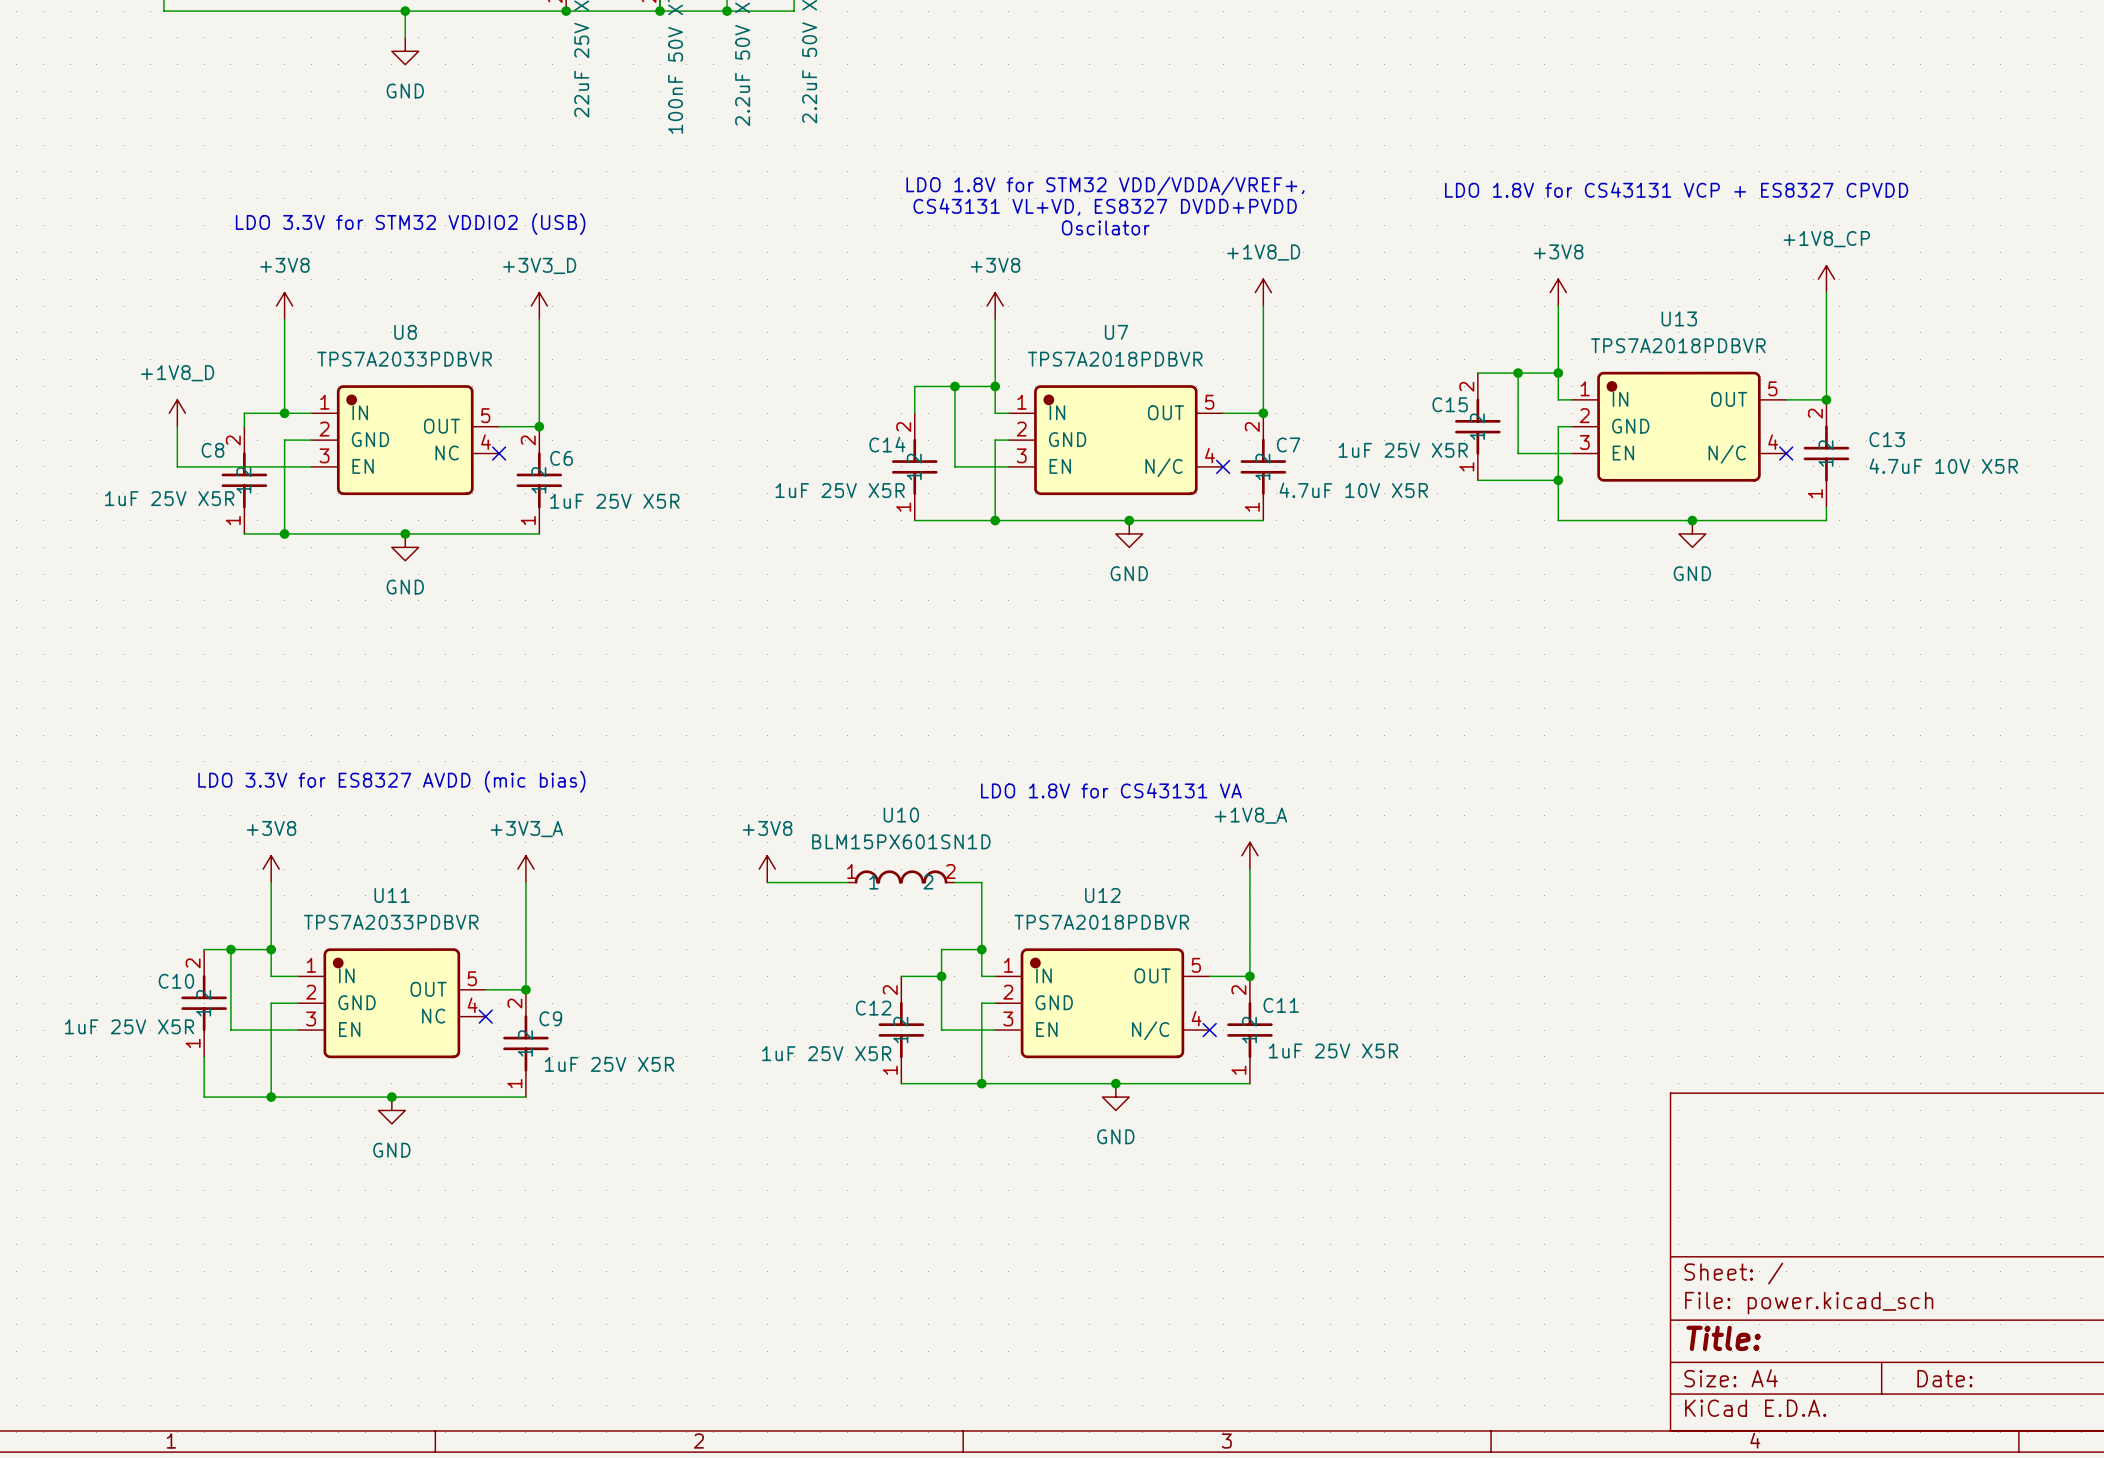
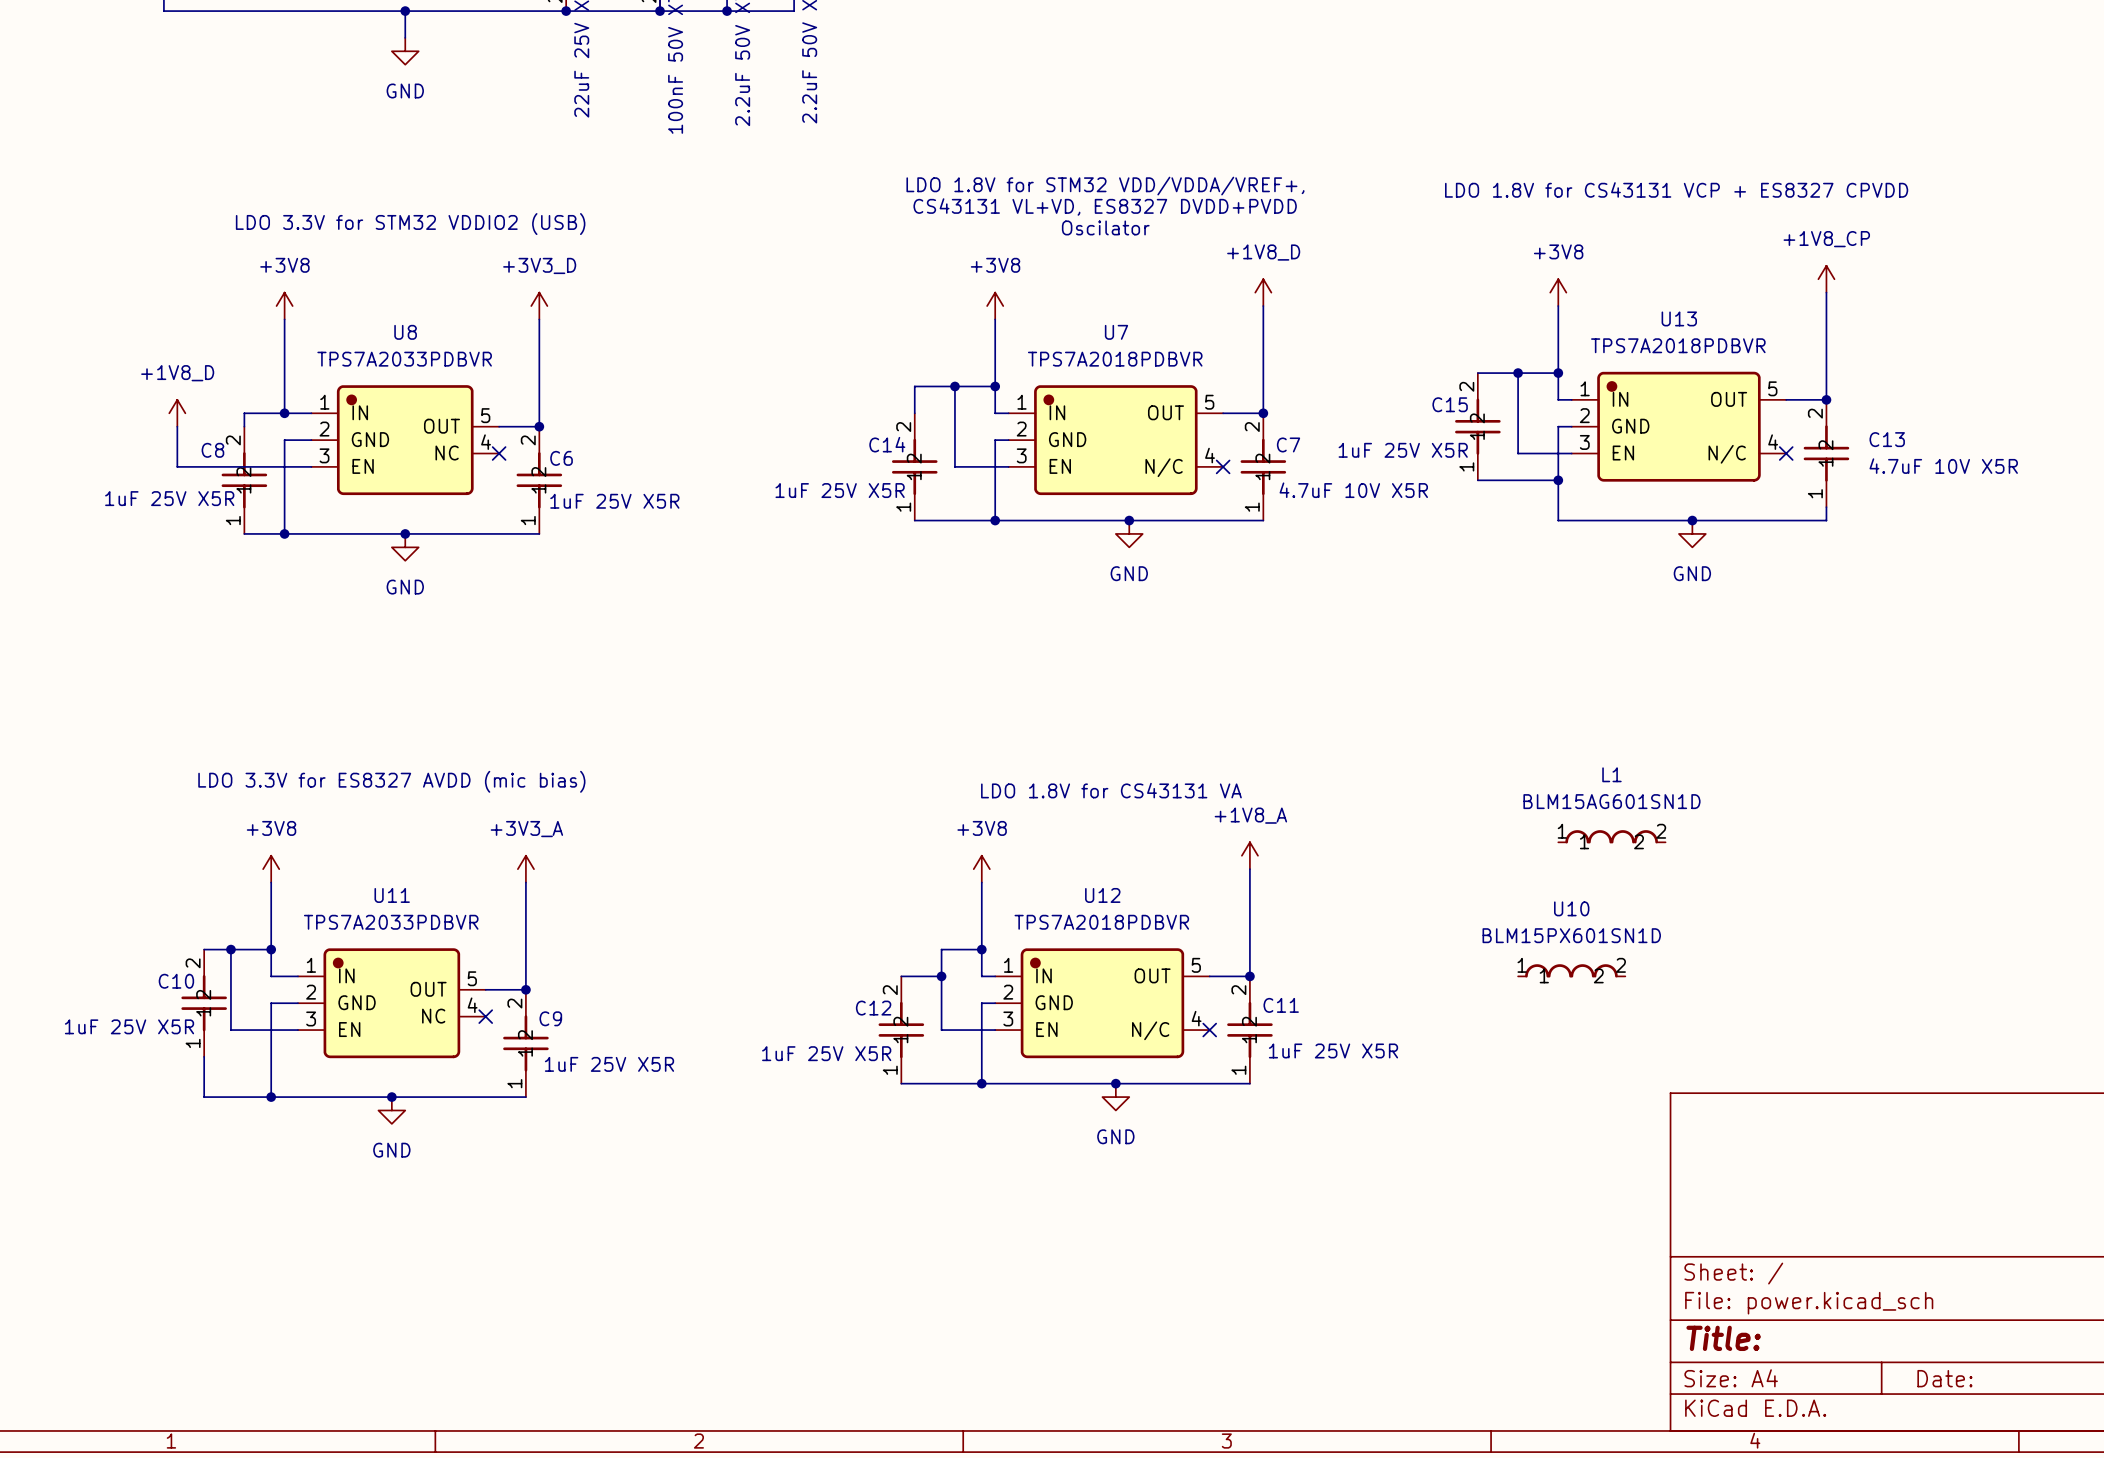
L1: none -> BLM15AG601SN1D (1611, 836)
power symbol position: +3V8 (767, 869) -> +3V8 (981, 869)
U10 position: (901, 877) -> (1571, 970)
wire: (767, 882) (847, 882) -> none
wire: (954, 882) (981, 882) -> none

